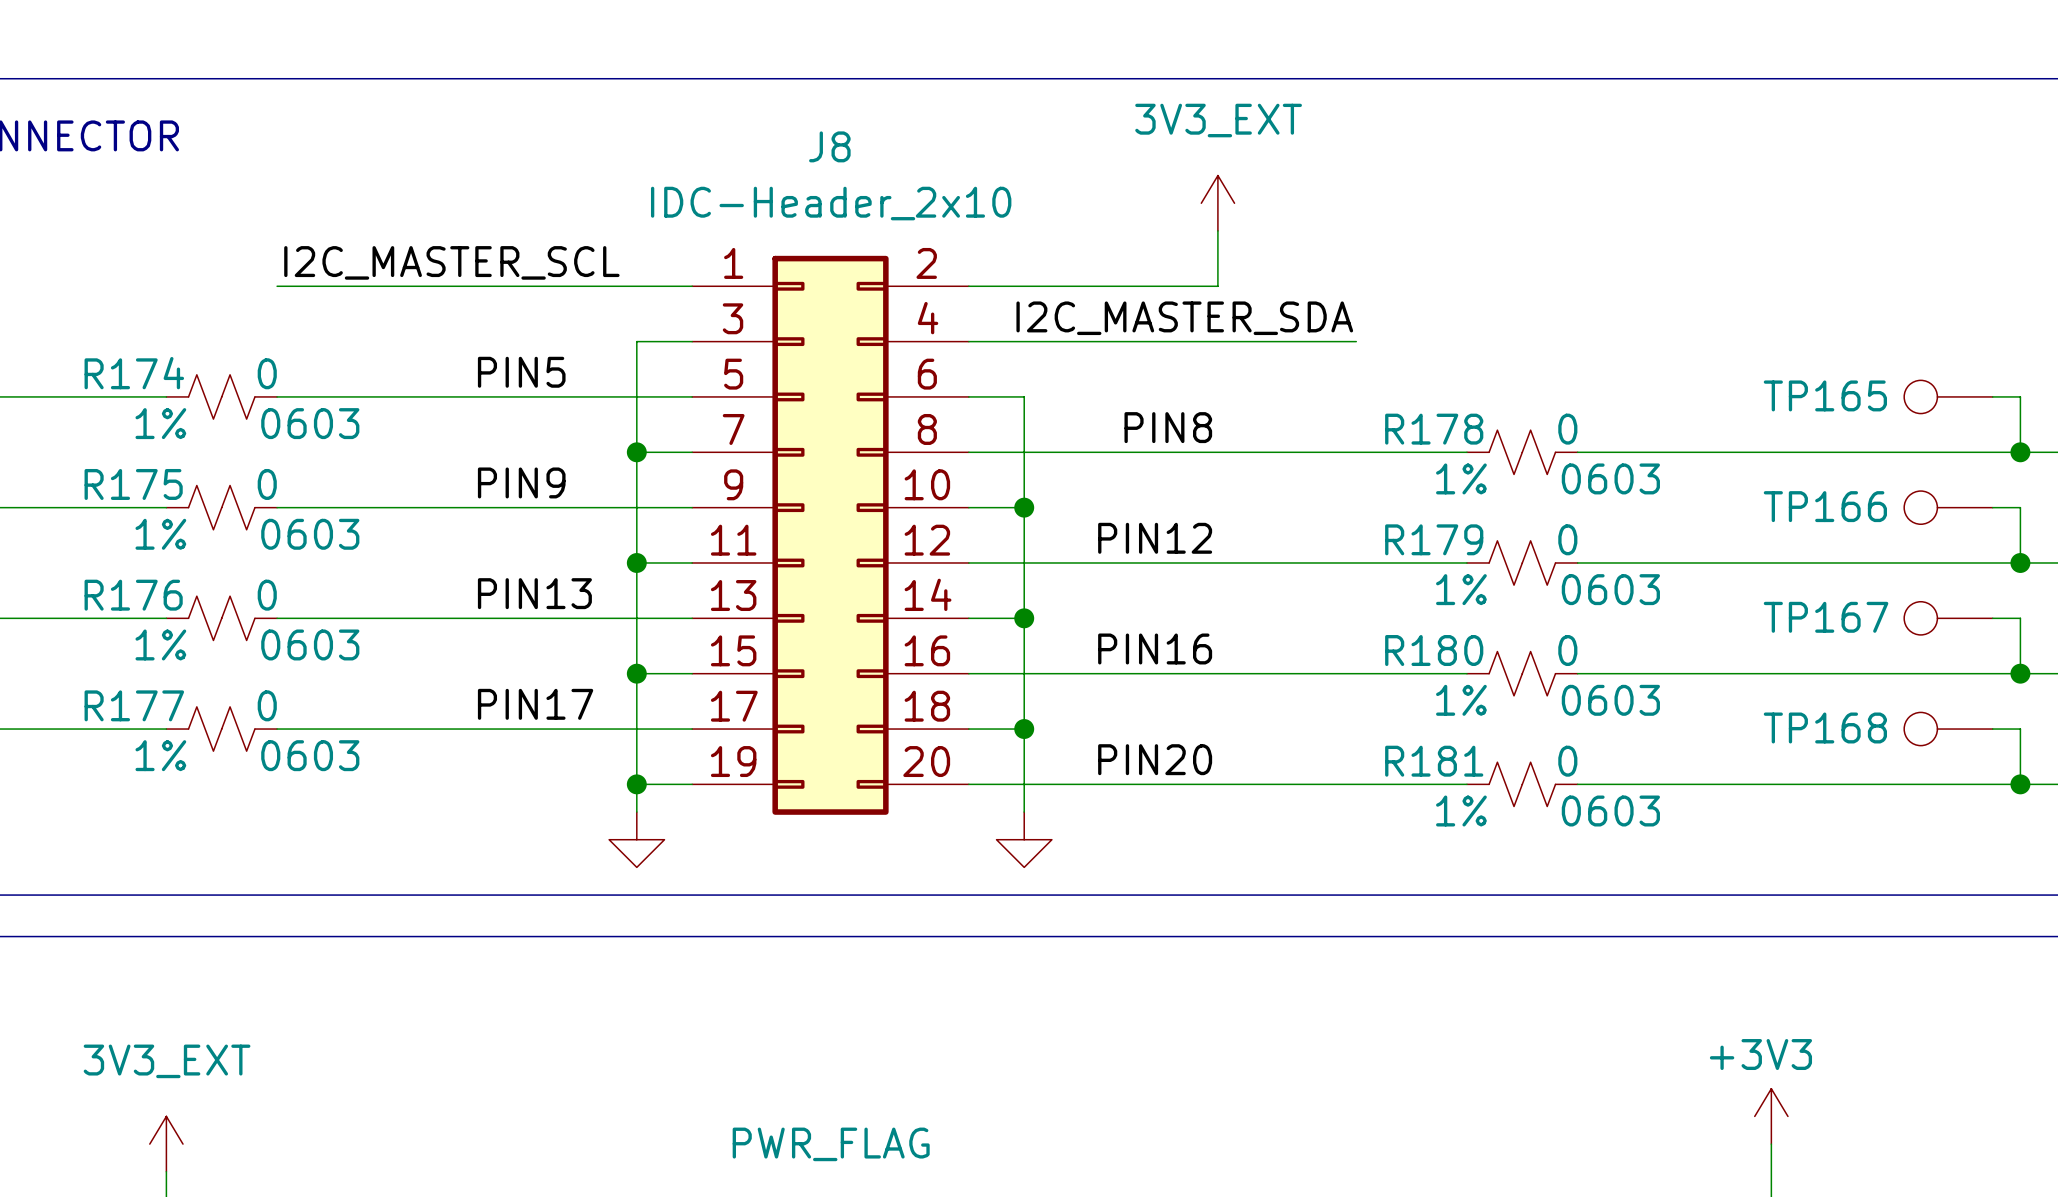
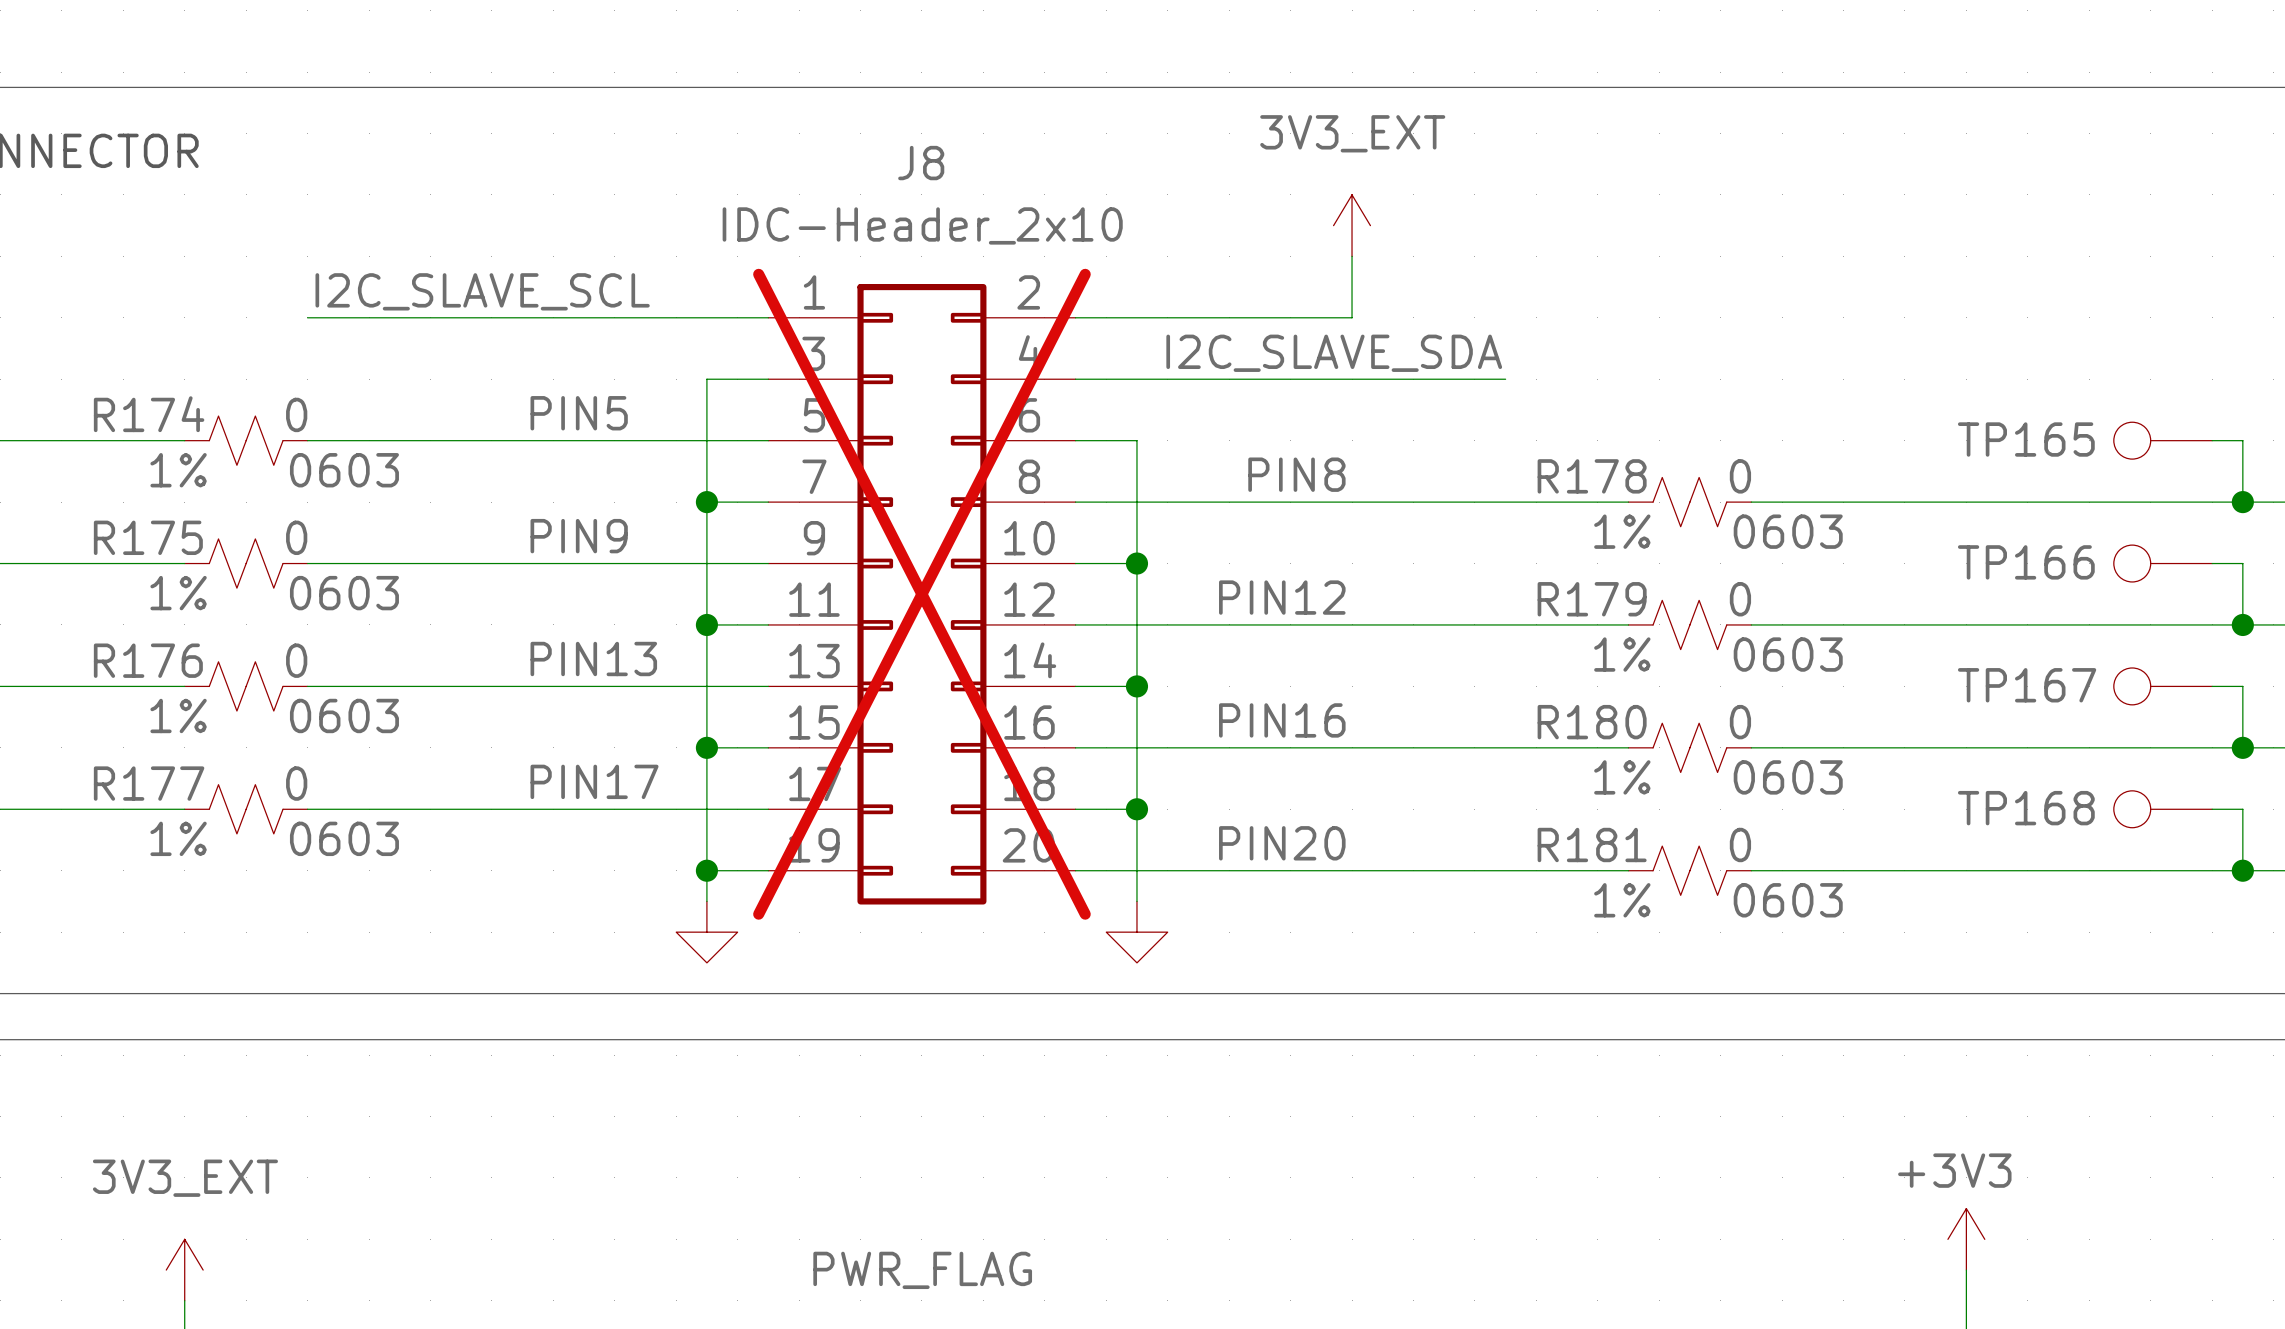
label: I2C_MASTER_SCL (451, 262) -> I2C_SLAVE_SCL (482, 291)
label: I2C_MASTER_SDA (1184, 318) -> I2C_SLAVE_SDA (1334, 353)
J8 do-not-place cross: none -> (921, 594)

